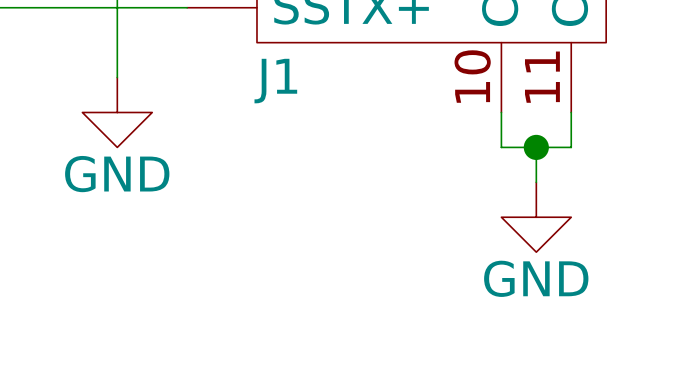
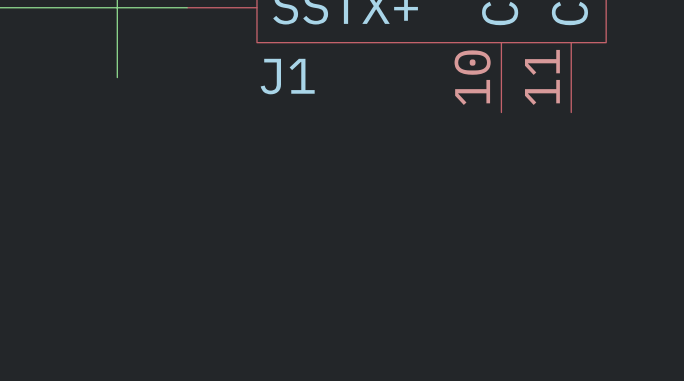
power symbol: GND (117, 112) -> none
wire: (501, 112) (501, 147) (571, 147) (571, 112) -> none
wire: (536, 147) (536, 182) -> none
junction: (536, 147) -> none
power symbol: GND (536, 217) -> none

